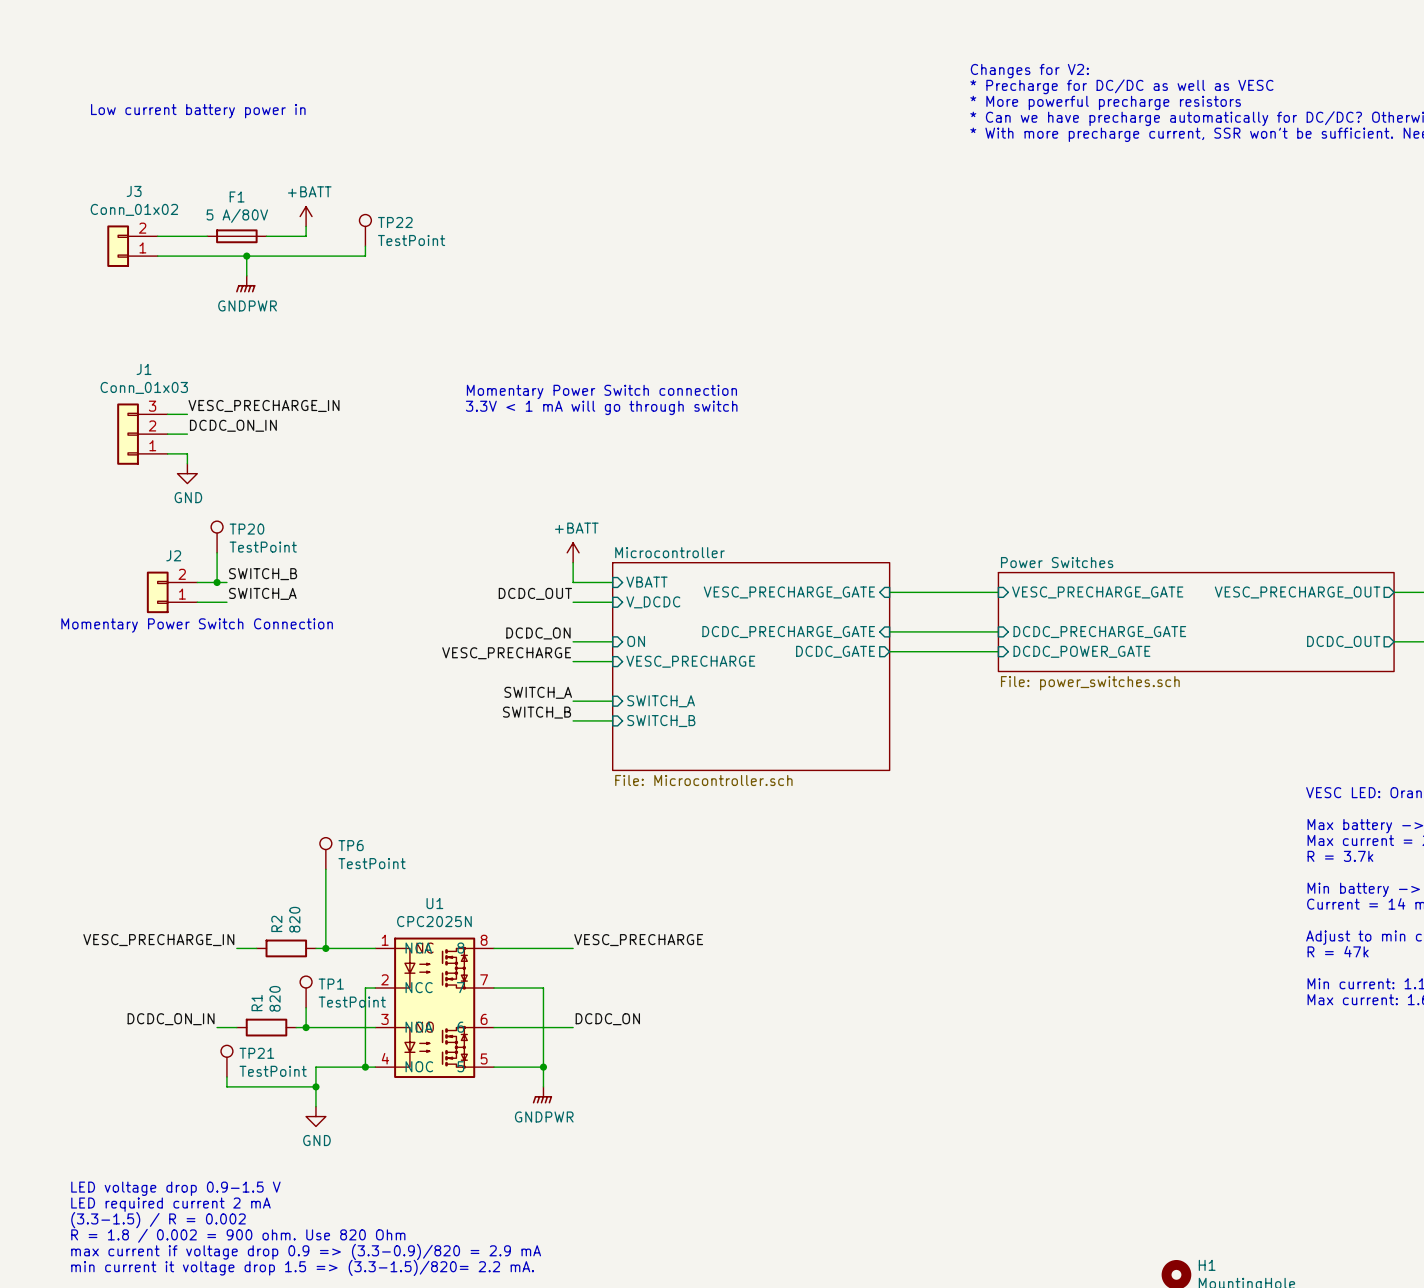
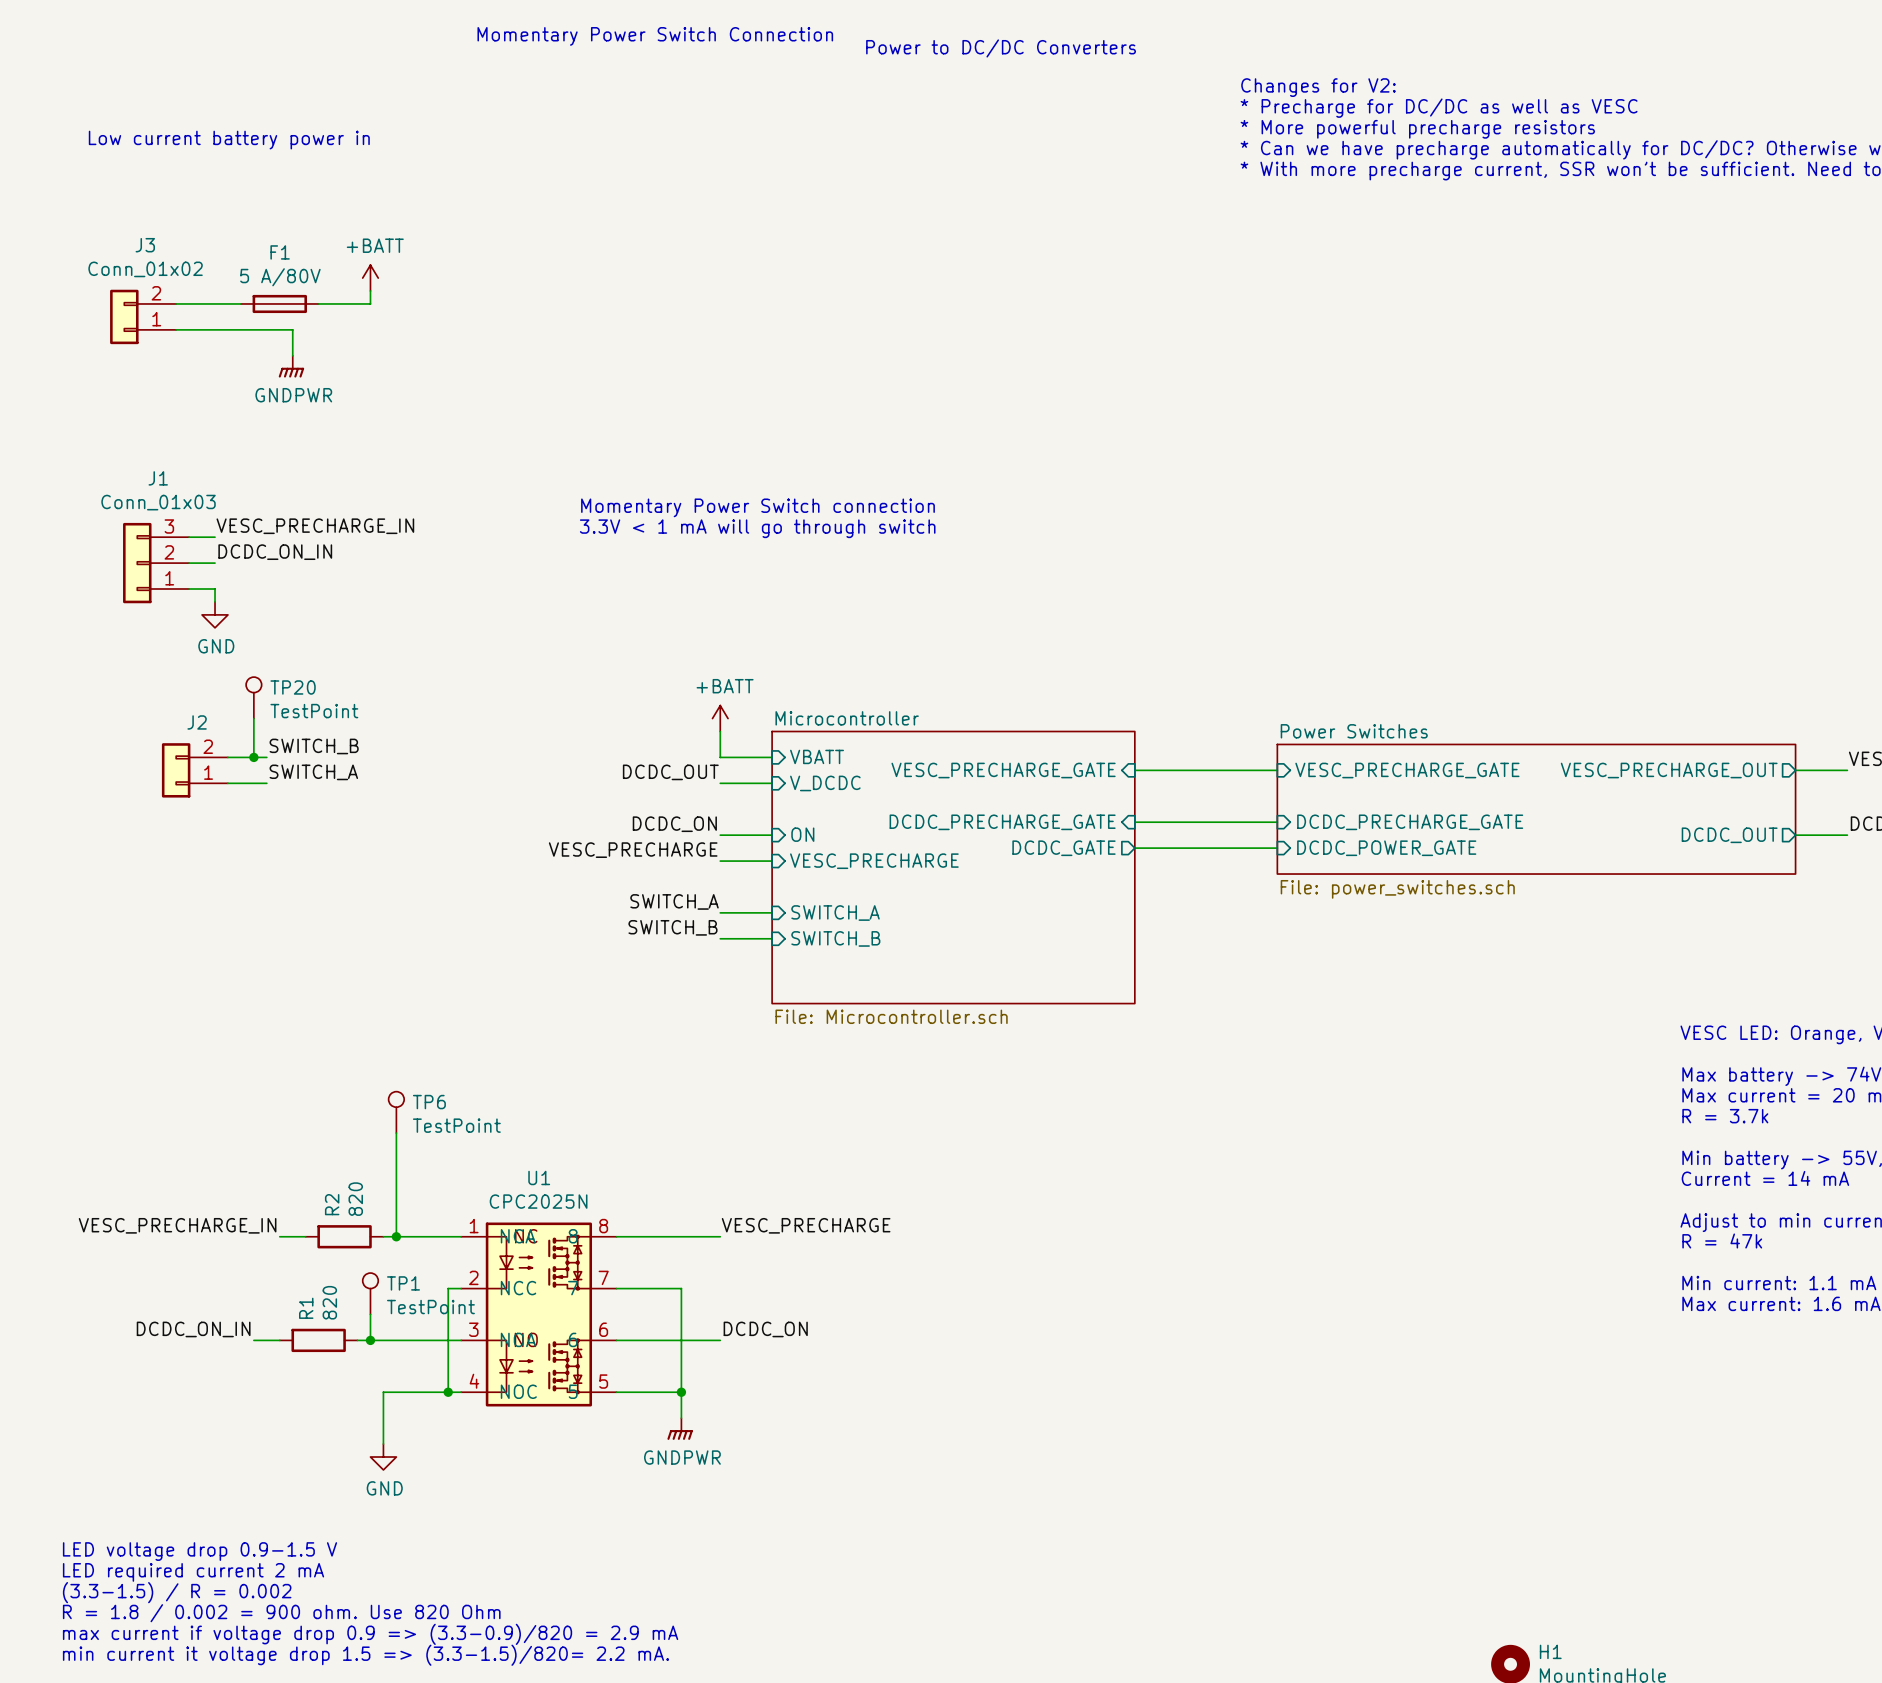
text: none -> Momentary Power Switch Connection (655, 36)
text: none -> Power to DC/DC Converters (1001, 48)
TP22: TestPoint (365, 230) -> none
wire: (365, 246) (365, 256) (246, 256) -> none
junction: (246, 256) -> none
text: Momentary Power Switch Connection (197, 625) -> none
TP21: TestPoint (226, 1061) -> none
wire: (226, 1077) (226, 1086) (315, 1086) -> none
junction: (315, 1086) -> none

